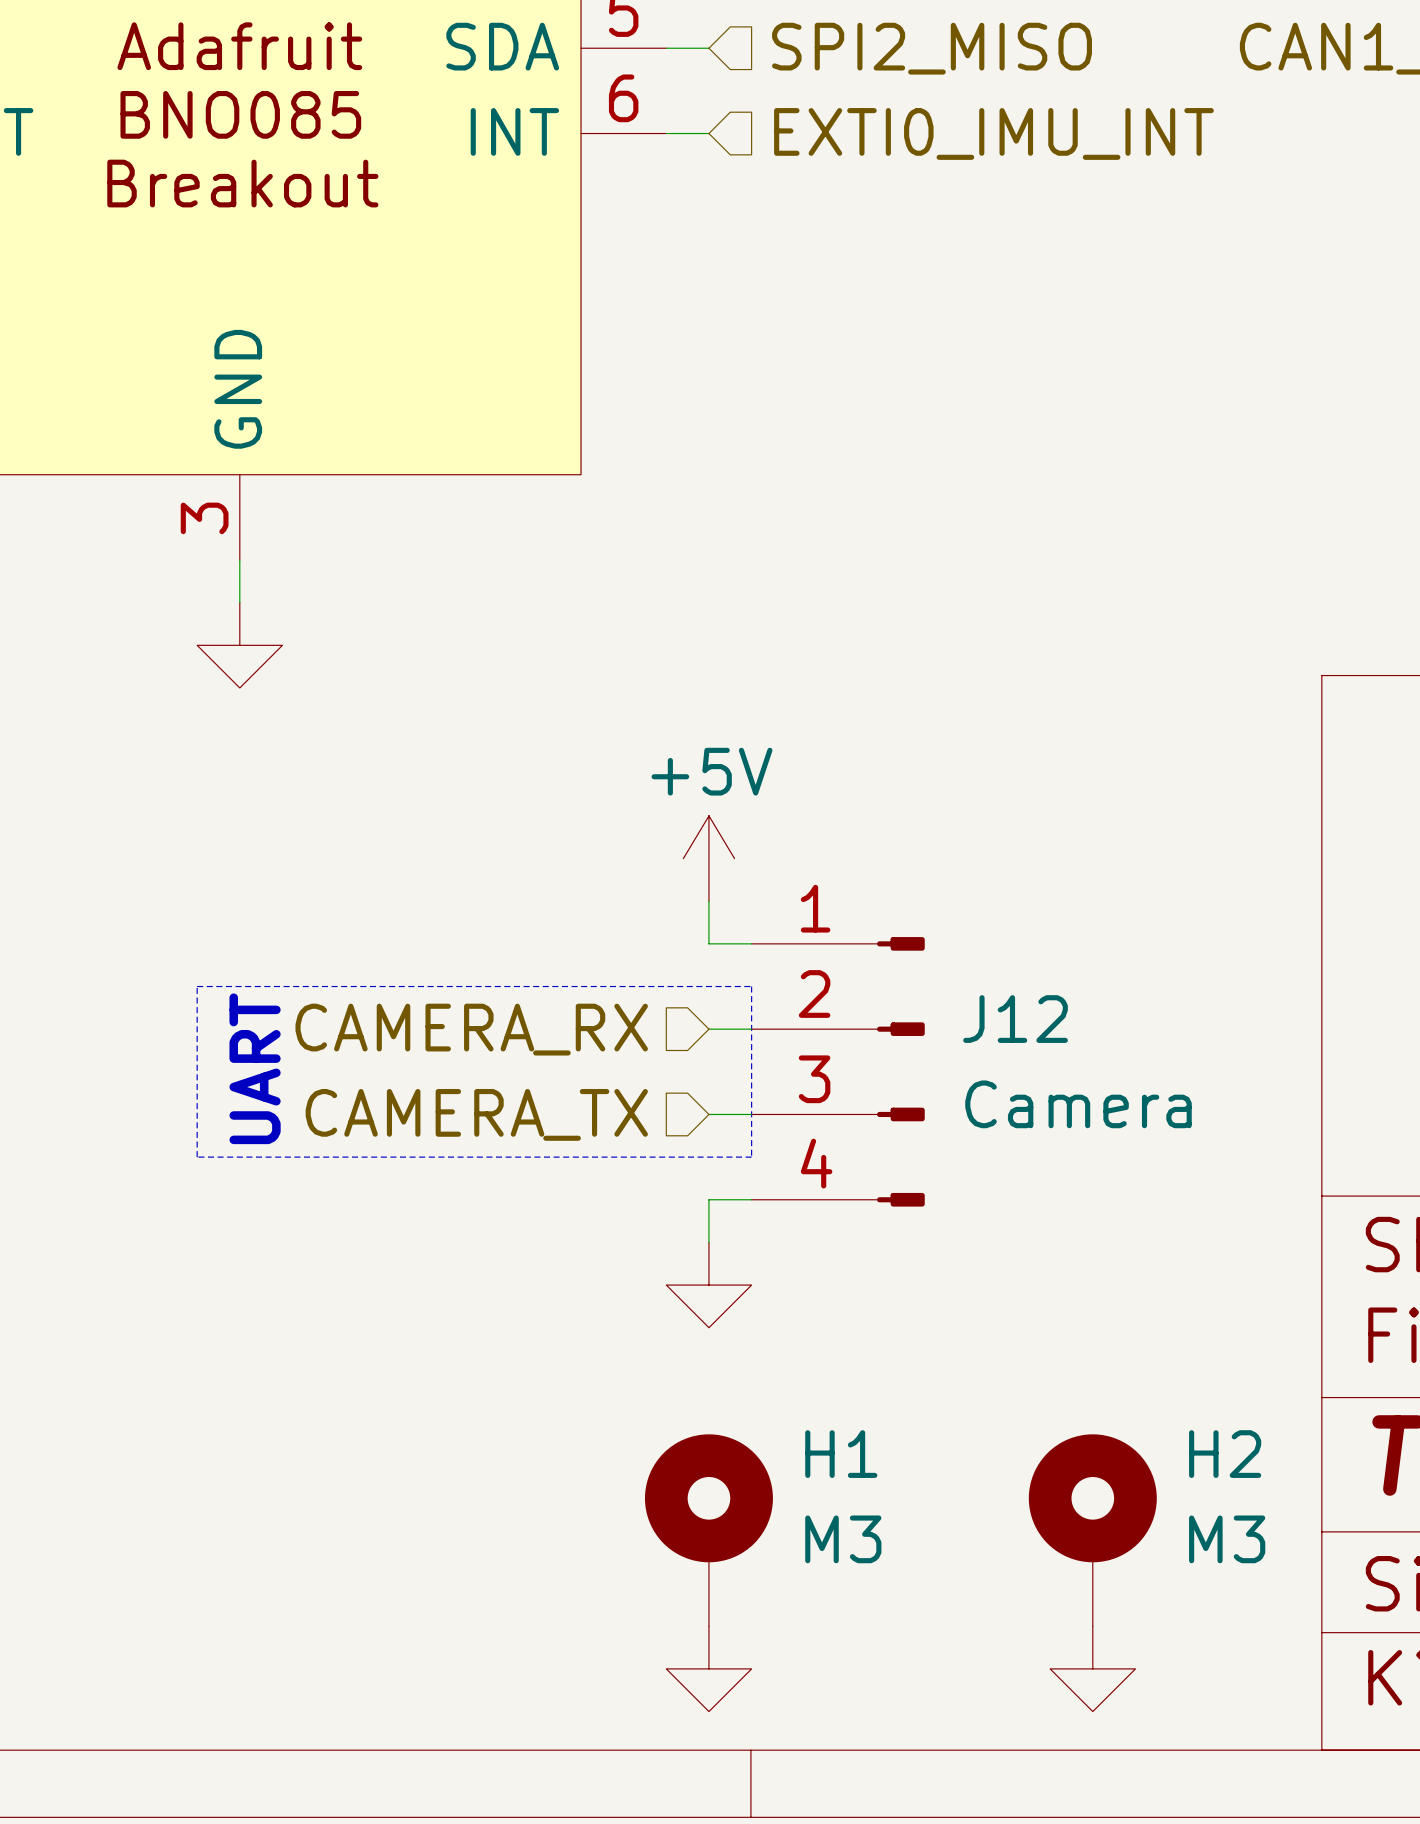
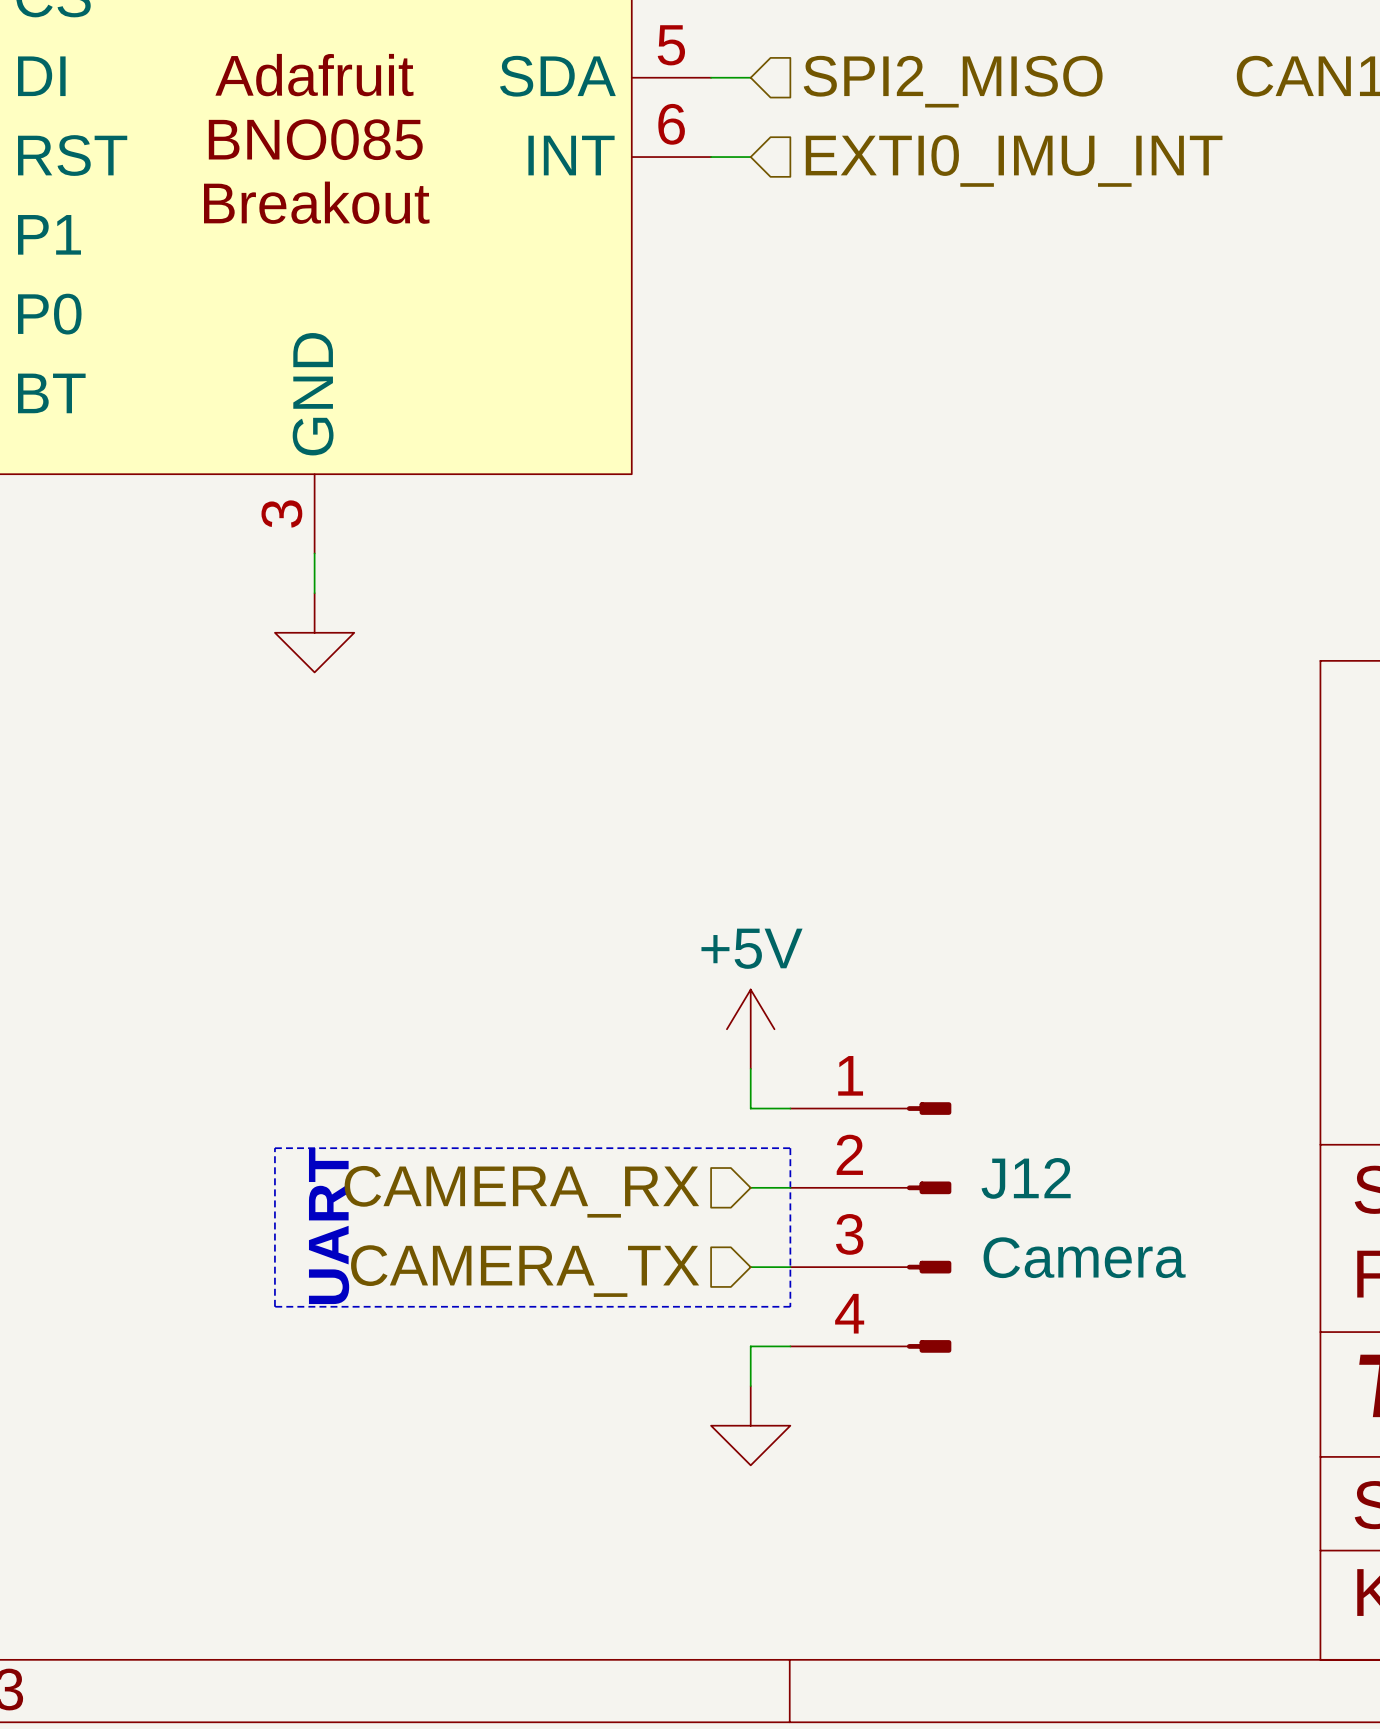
power symbol position: +5V (708, 858) -> +5V (750, 1029)
wire: (708, 901) (708, 943) (751, 943) -> none
line: (197, 986) (751, 986) (751, 1157) (197, 1157) (197, 986) -> (274, 1148) (790, 1148) (790, 1306) (274, 1306) (274, 1148)
hierarchical label position: CAMERA_RX (471, 1029) -> CAMERA_RX (521, 1191)
wire: (708, 1029) (751, 1029) -> (750, 1267) (790, 1267)
text position: UART (255, 1068) -> UART (329, 1226)
J12 position: (838, 1071) -> (870, 1227)
hierarchical label position: CAMERA_TX (476, 1114) -> CAMERA_TX (525, 1271)
wire: (708, 1114) (751, 1114) -> (750, 1068) (750, 1108) (790, 1108)
wire: (751, 1199) (708, 1199) (708, 1242) -> (790, 1187) (750, 1187)
power symbol: (708, 1285) -> none
wire: none -> (790, 1346) (750, 1346) (750, 1386)
power symbol: none -> (750, 1425)
H1: M3 (708, 1530) -> none
H2: M3 (1092, 1530) -> none
power symbol: (708, 1668) -> none
power symbol: (1092, 1668) -> none

